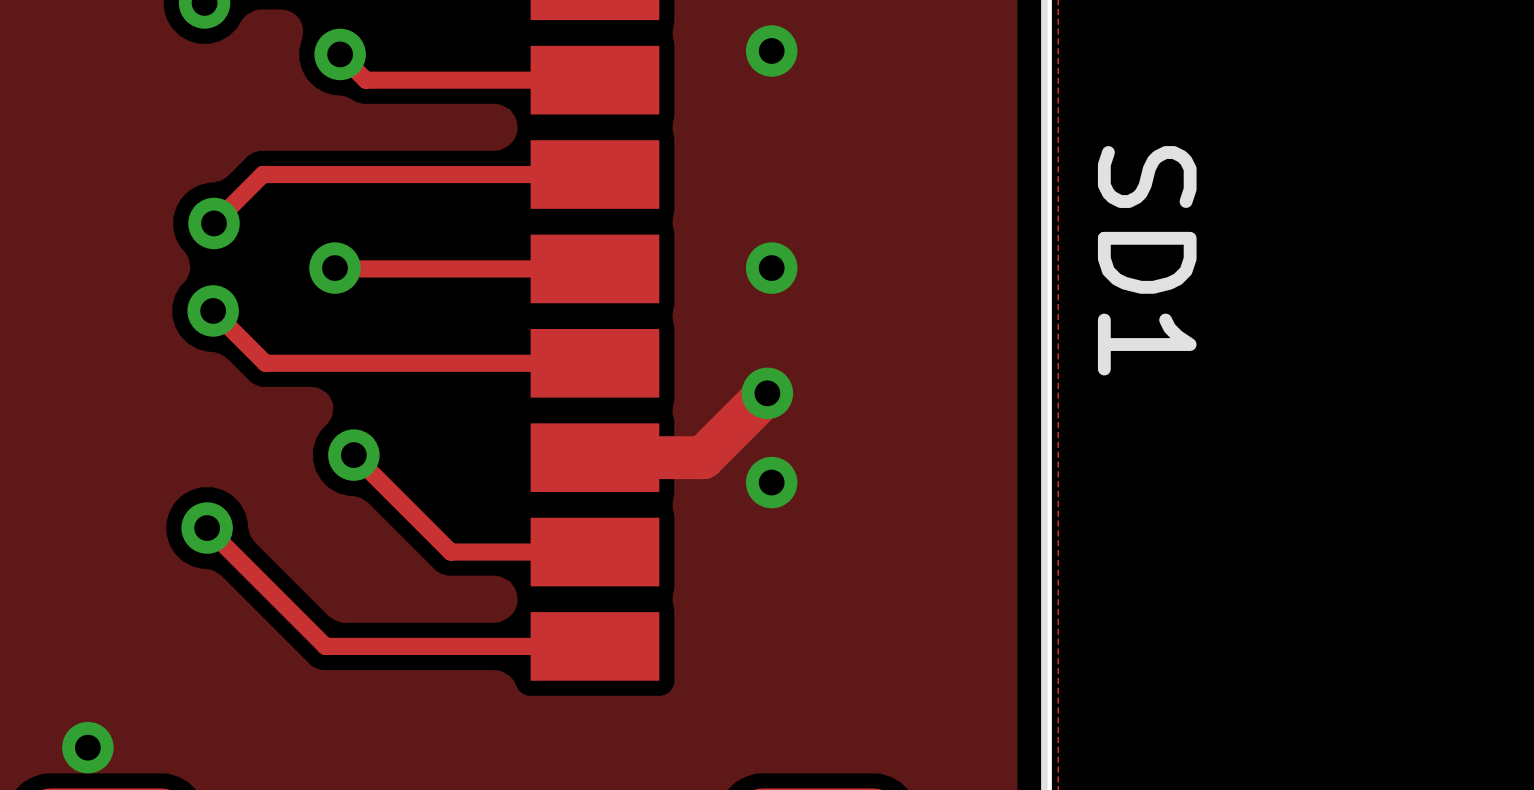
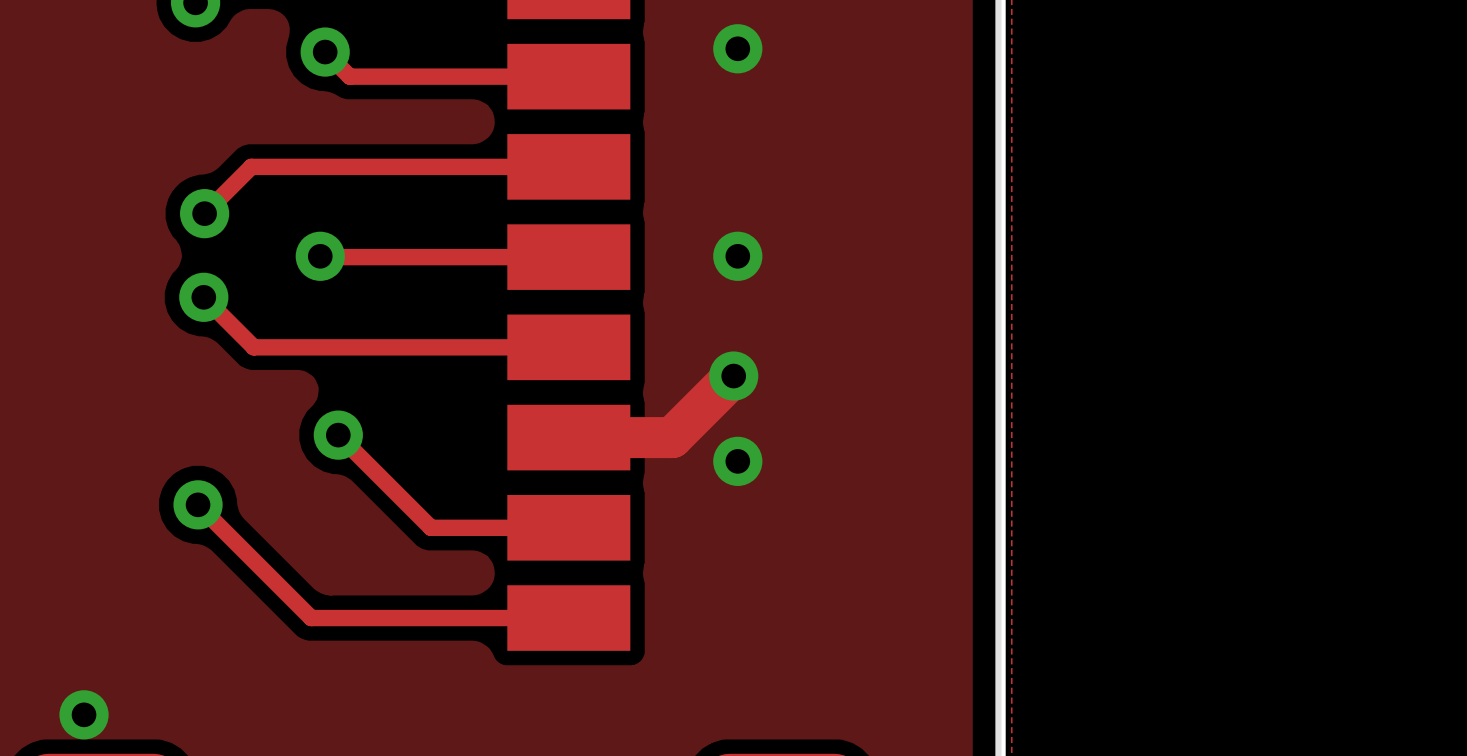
SD1 name: SD1 (1147, 260) -> none

